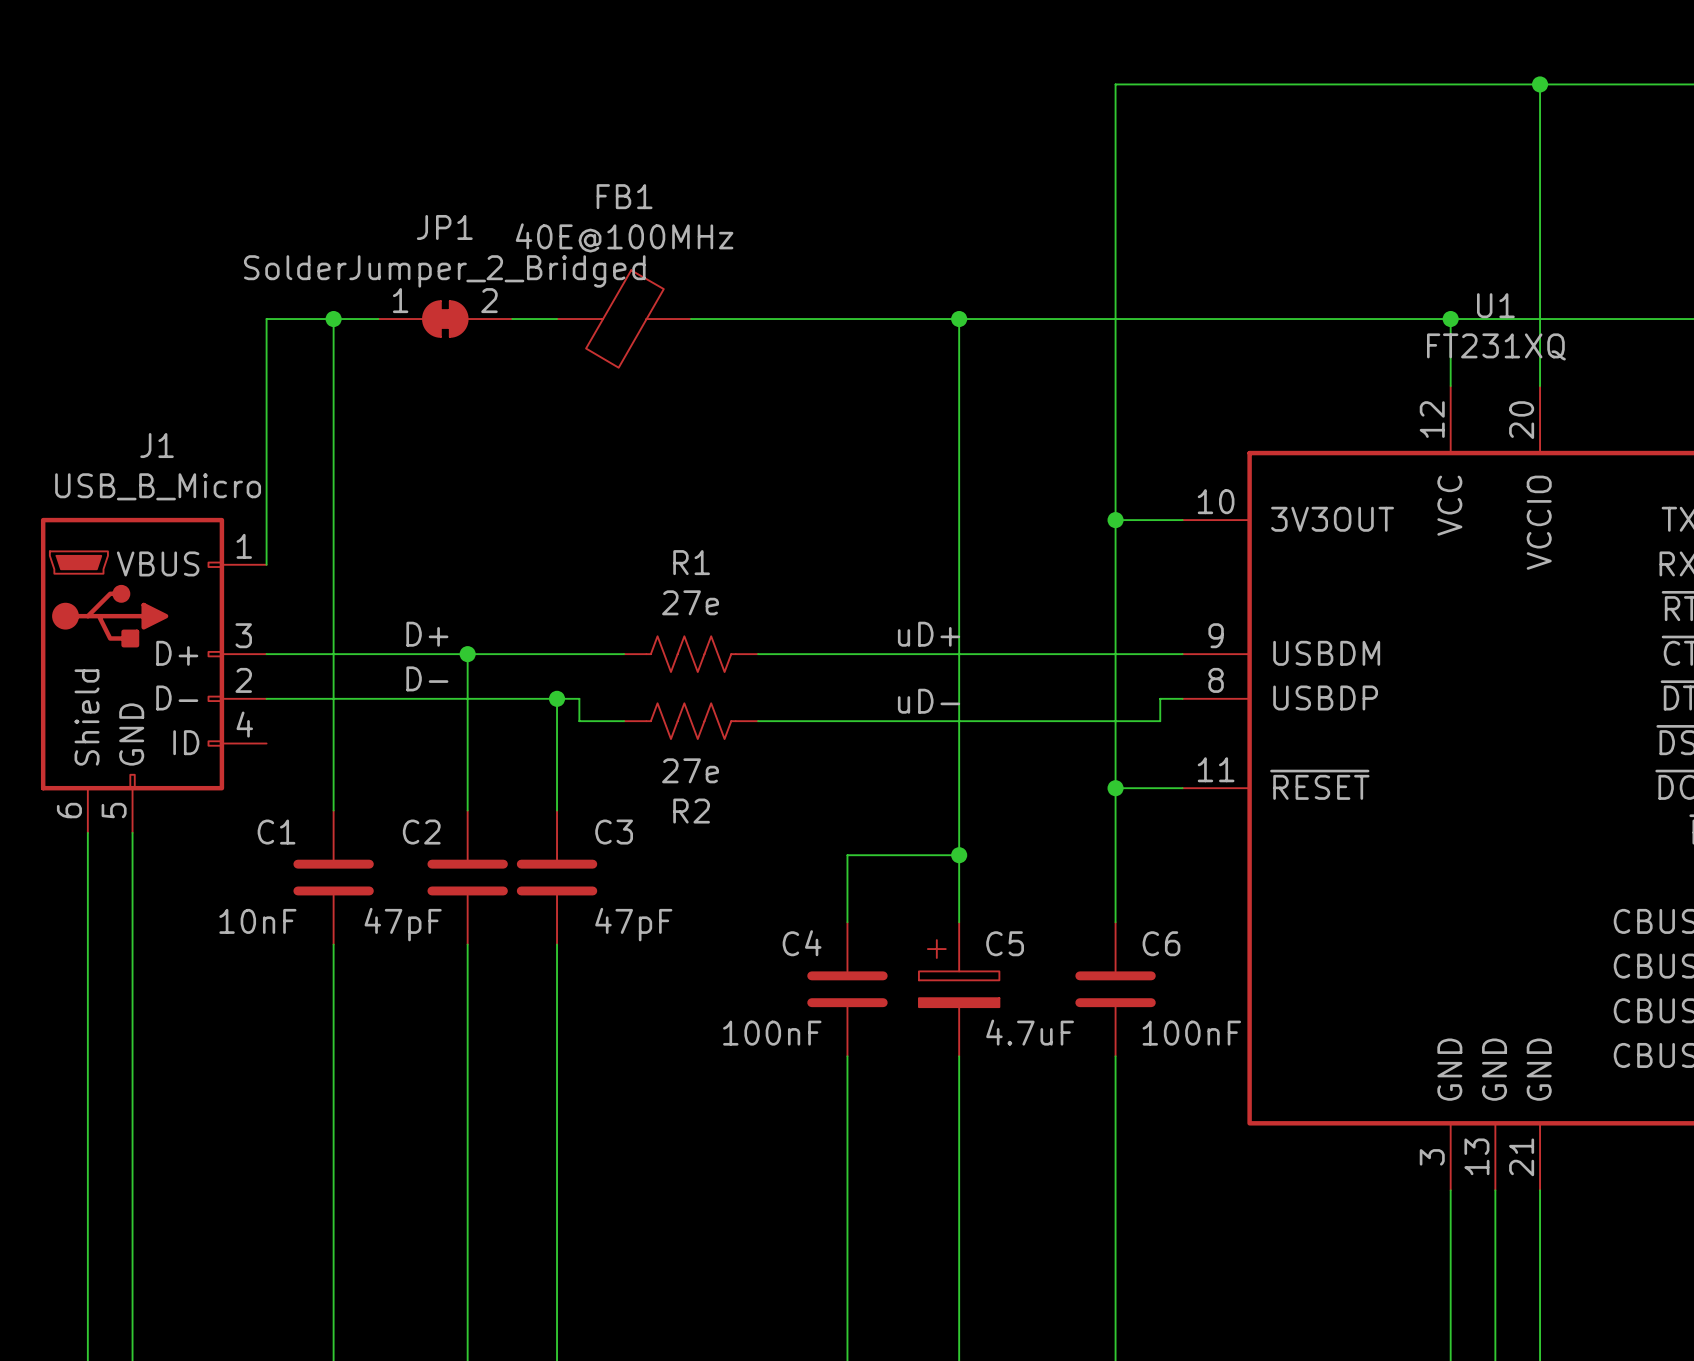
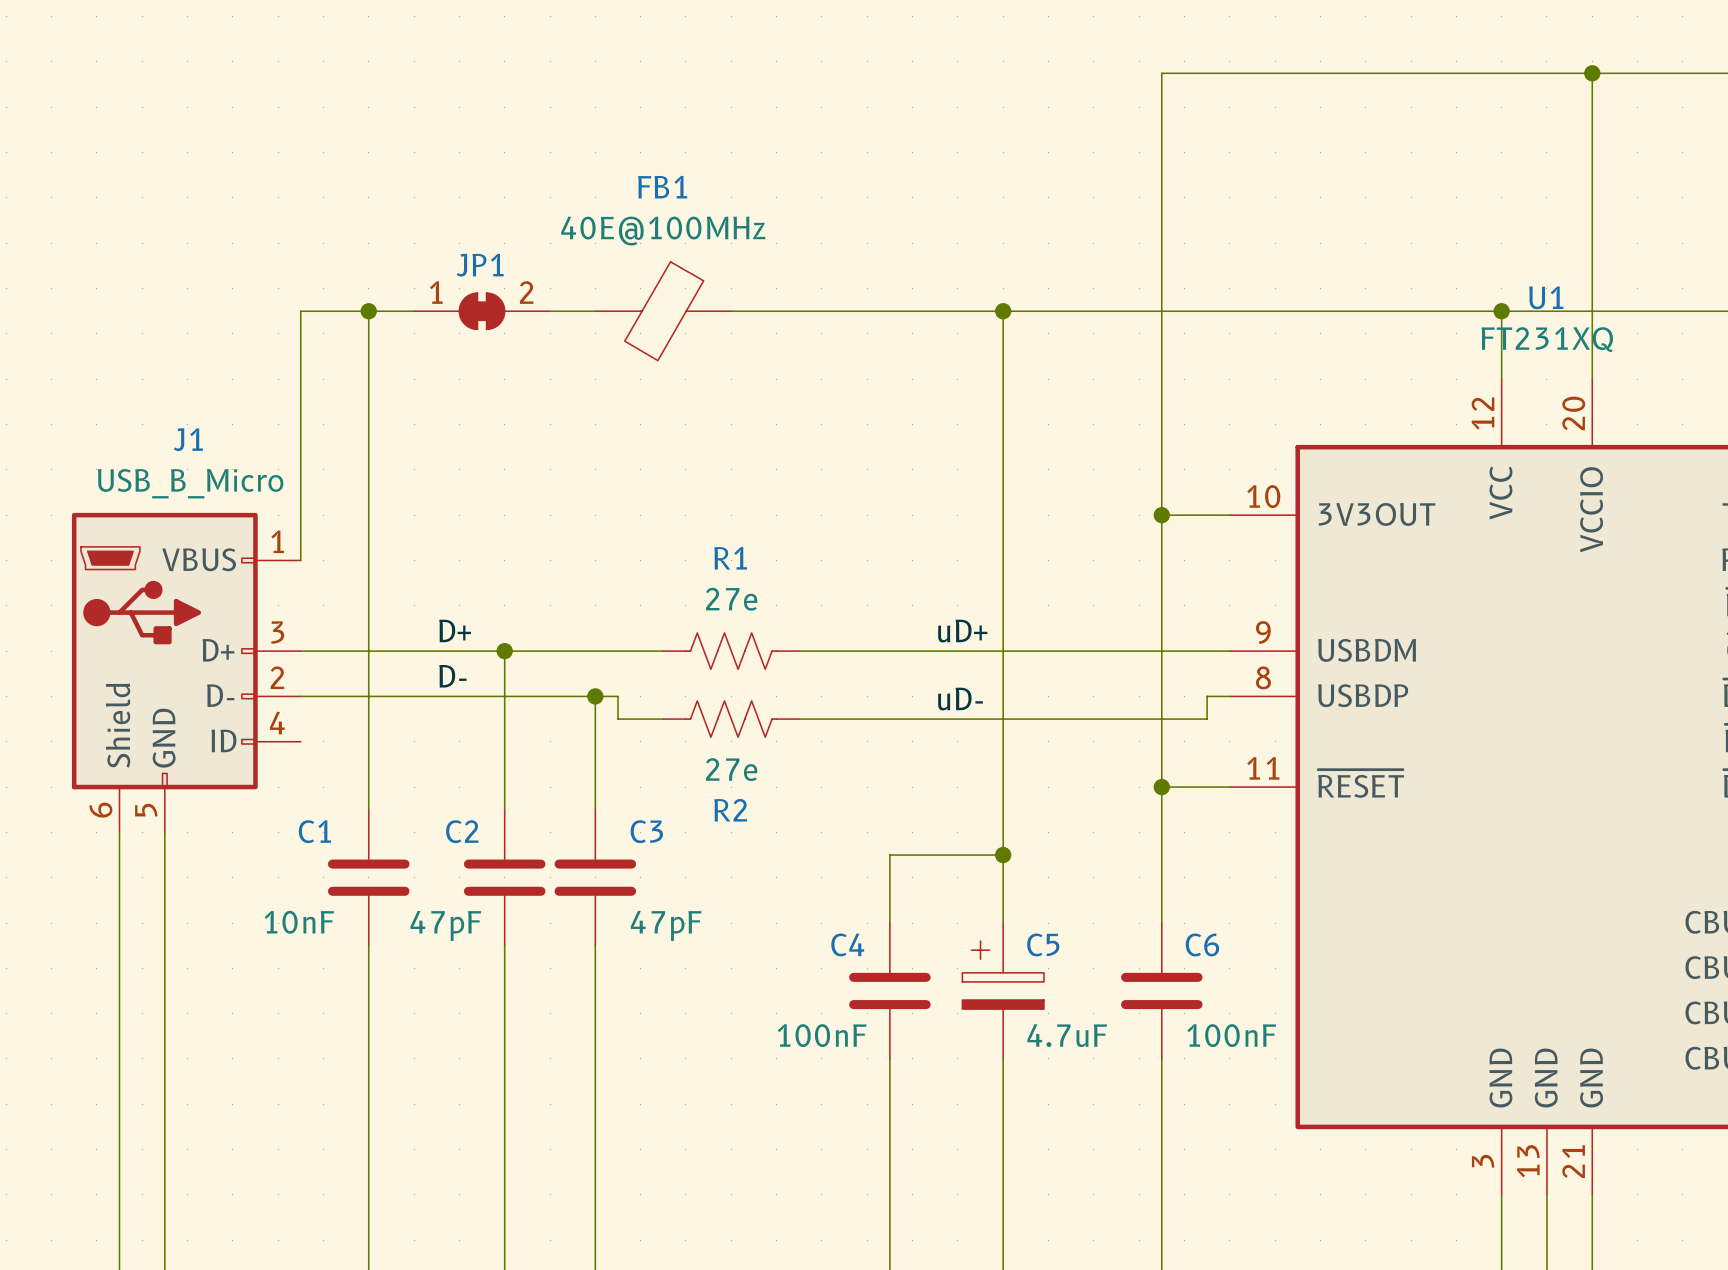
JP1 name position: JP1 (444, 227) -> JP1 (480, 265)
JP1 value: SolderJumper_2_Bridged (444, 271) -> none

